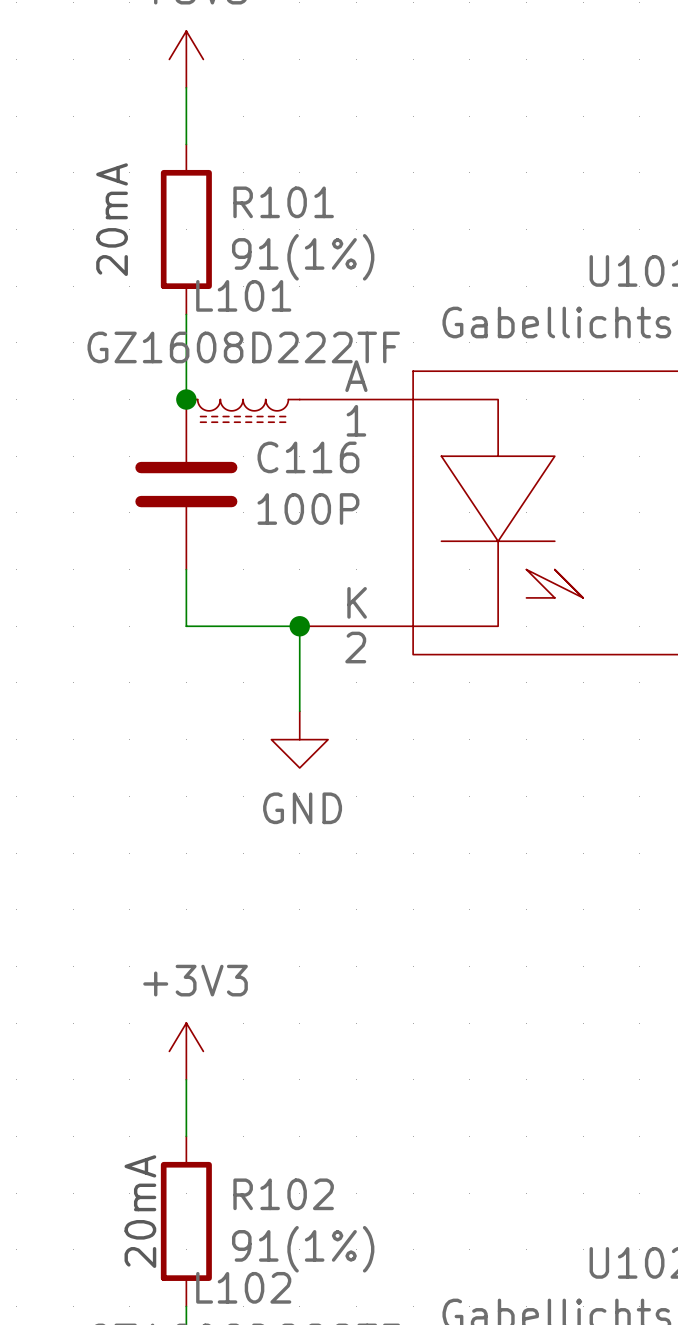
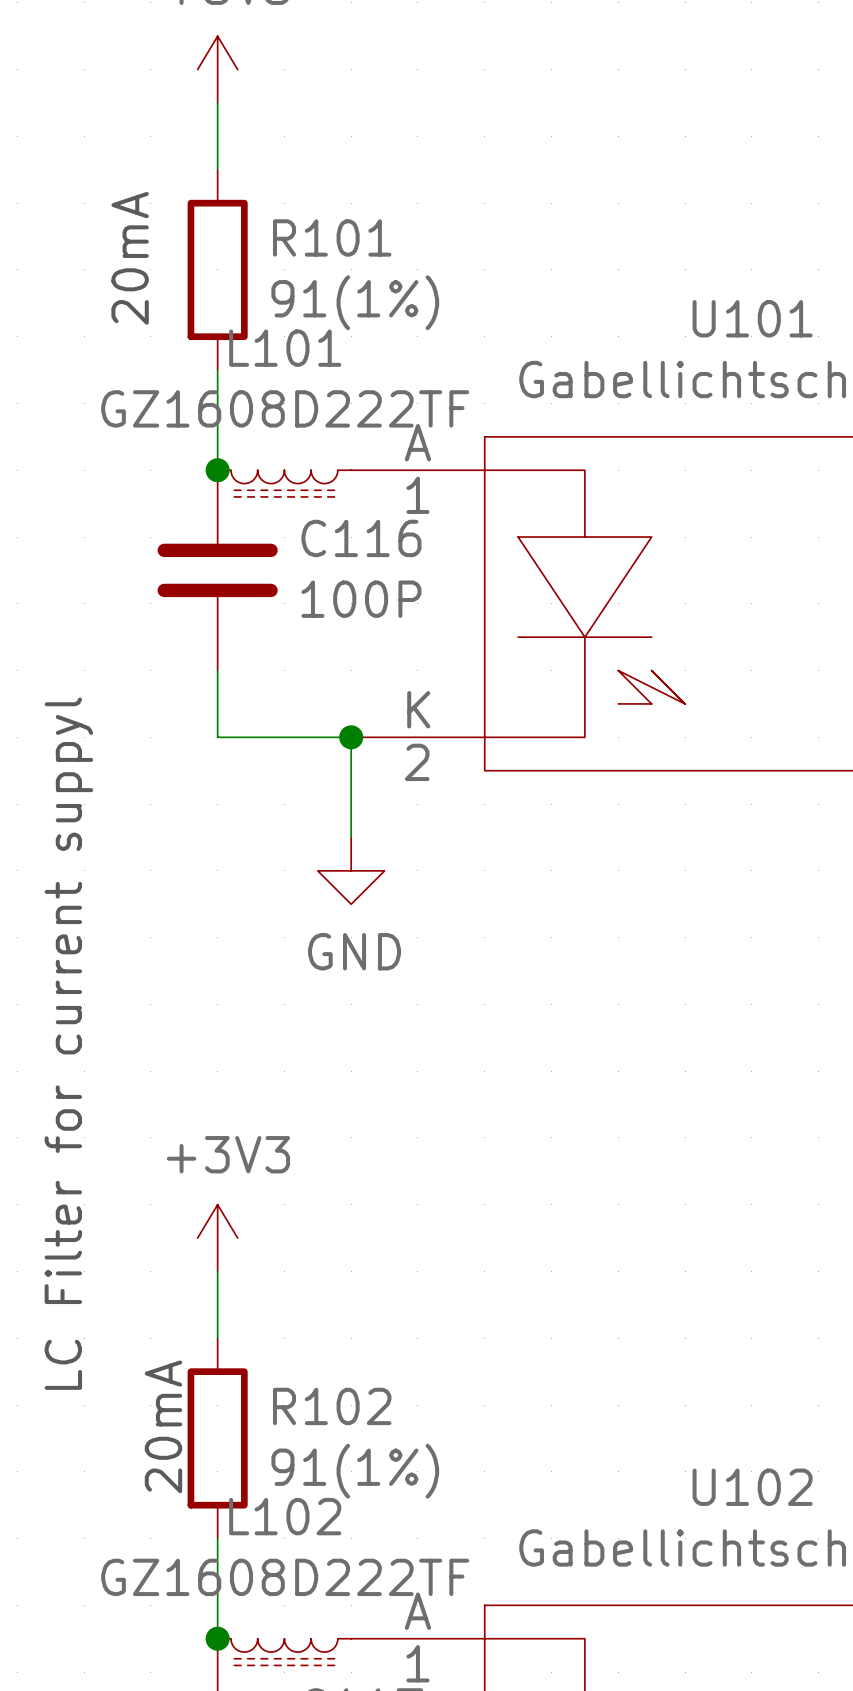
text: none -> LC Filter for current suppyl (68, 1043)

